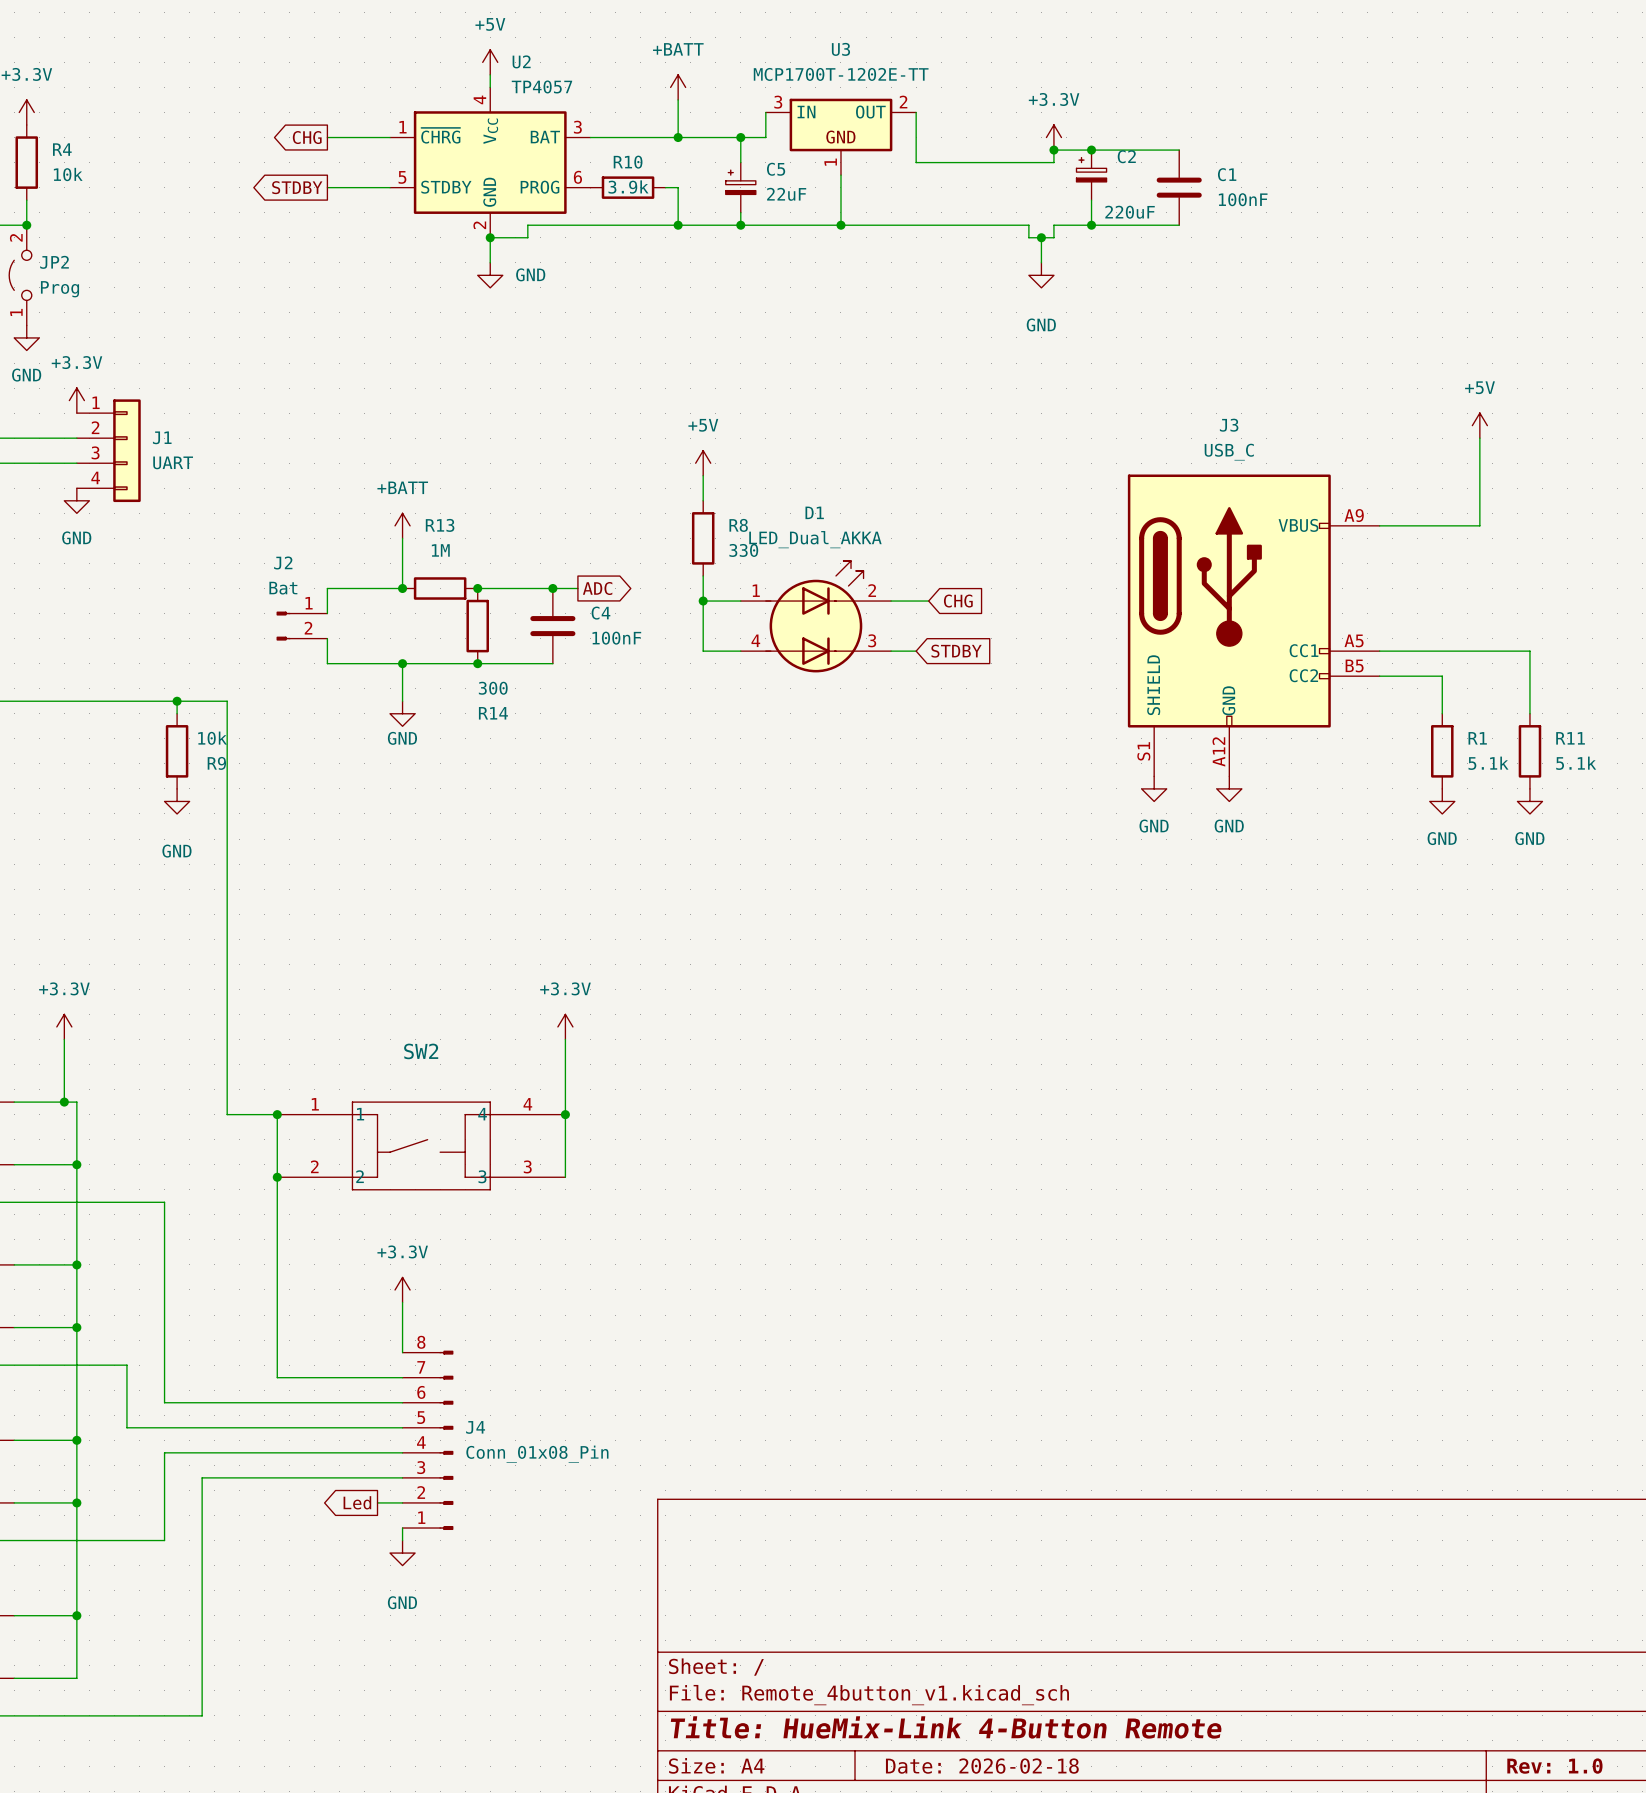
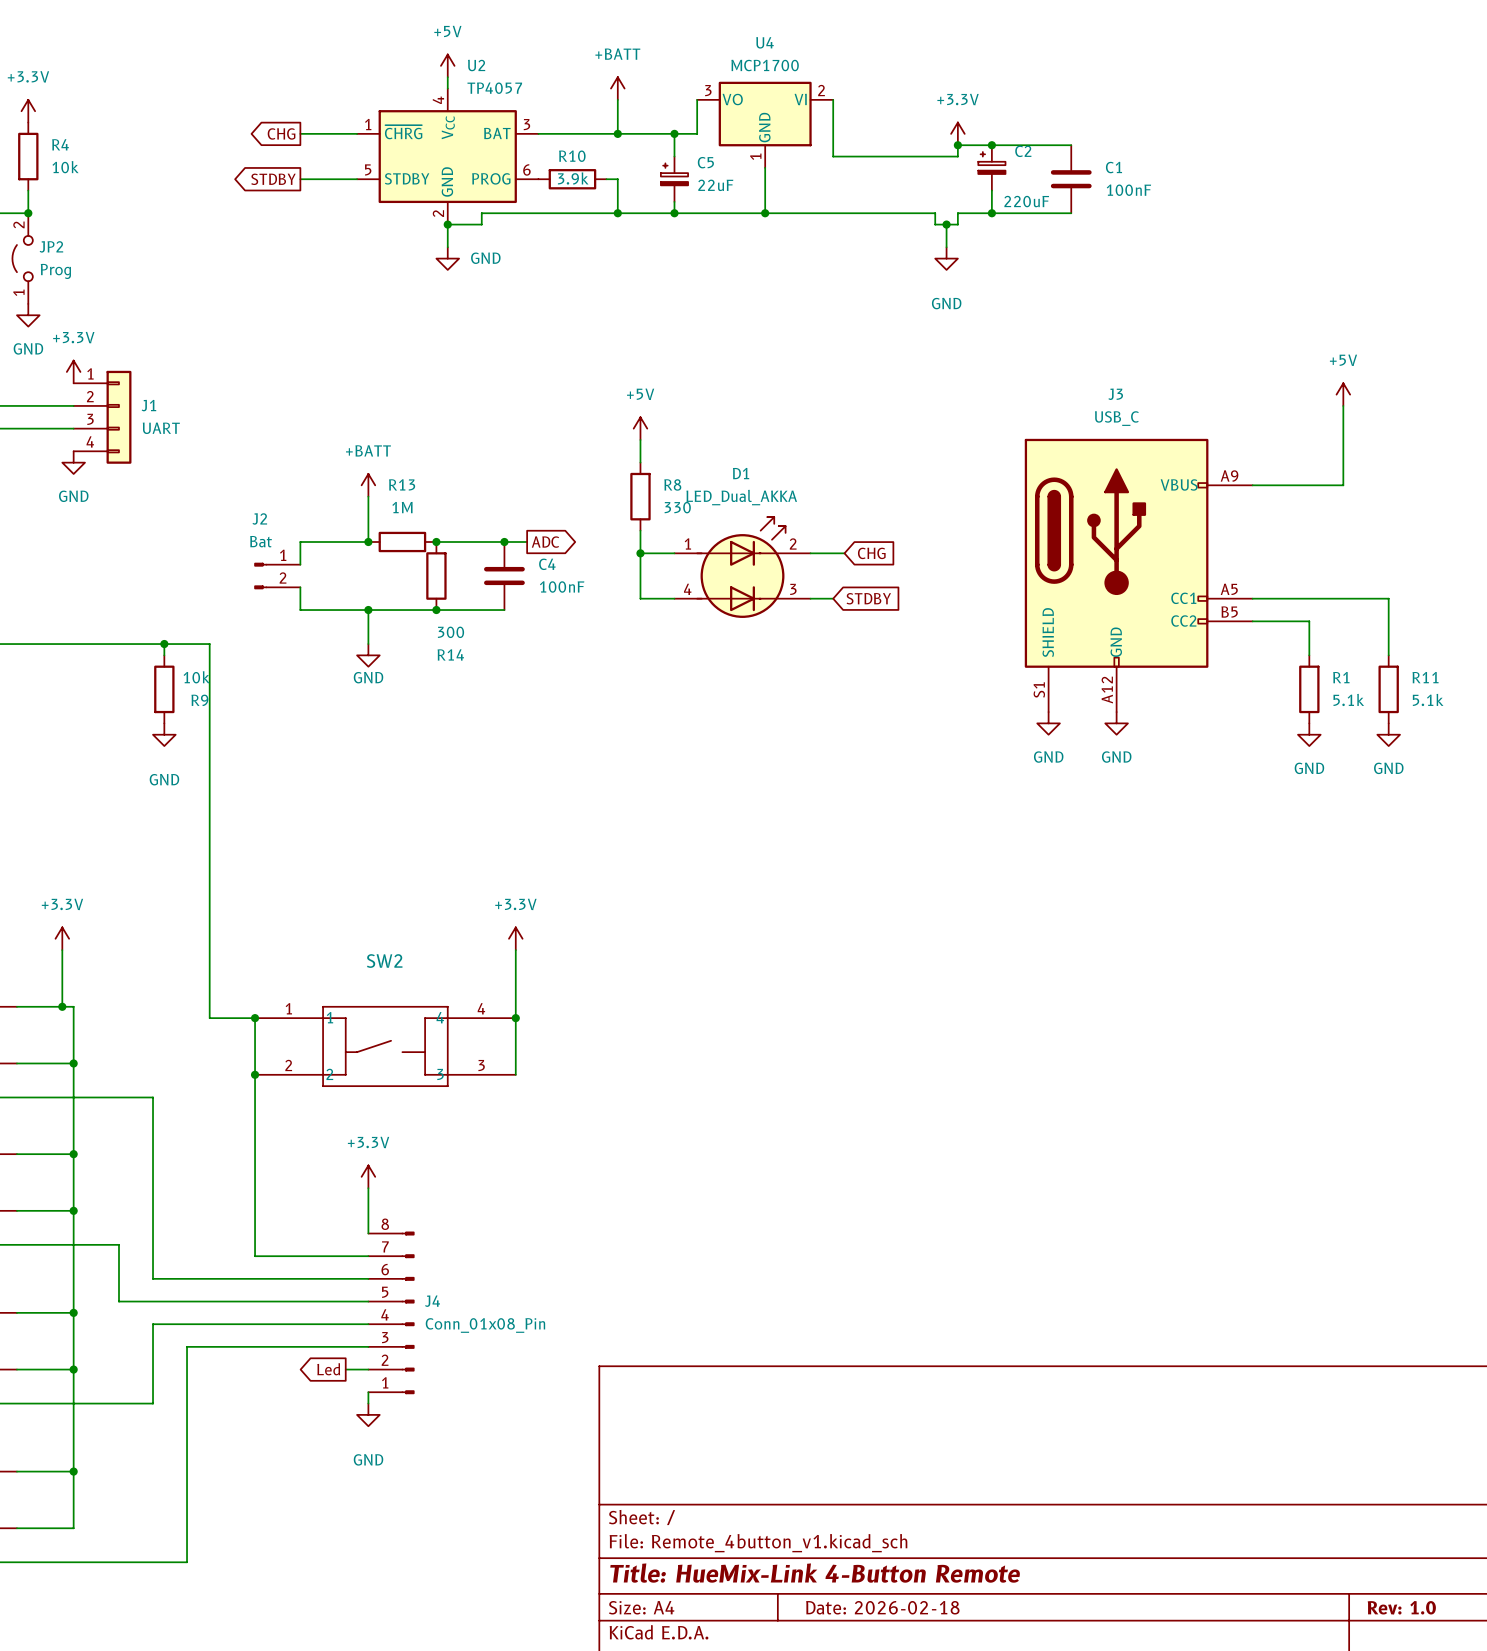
wire: none -> (697, 99) (697, 111)
wire: none -> (833, 99) (833, 111)
U4: none -> MCP1700 (765, 124)
U3: MCP1700T-1202E-TT (840, 136) -> none

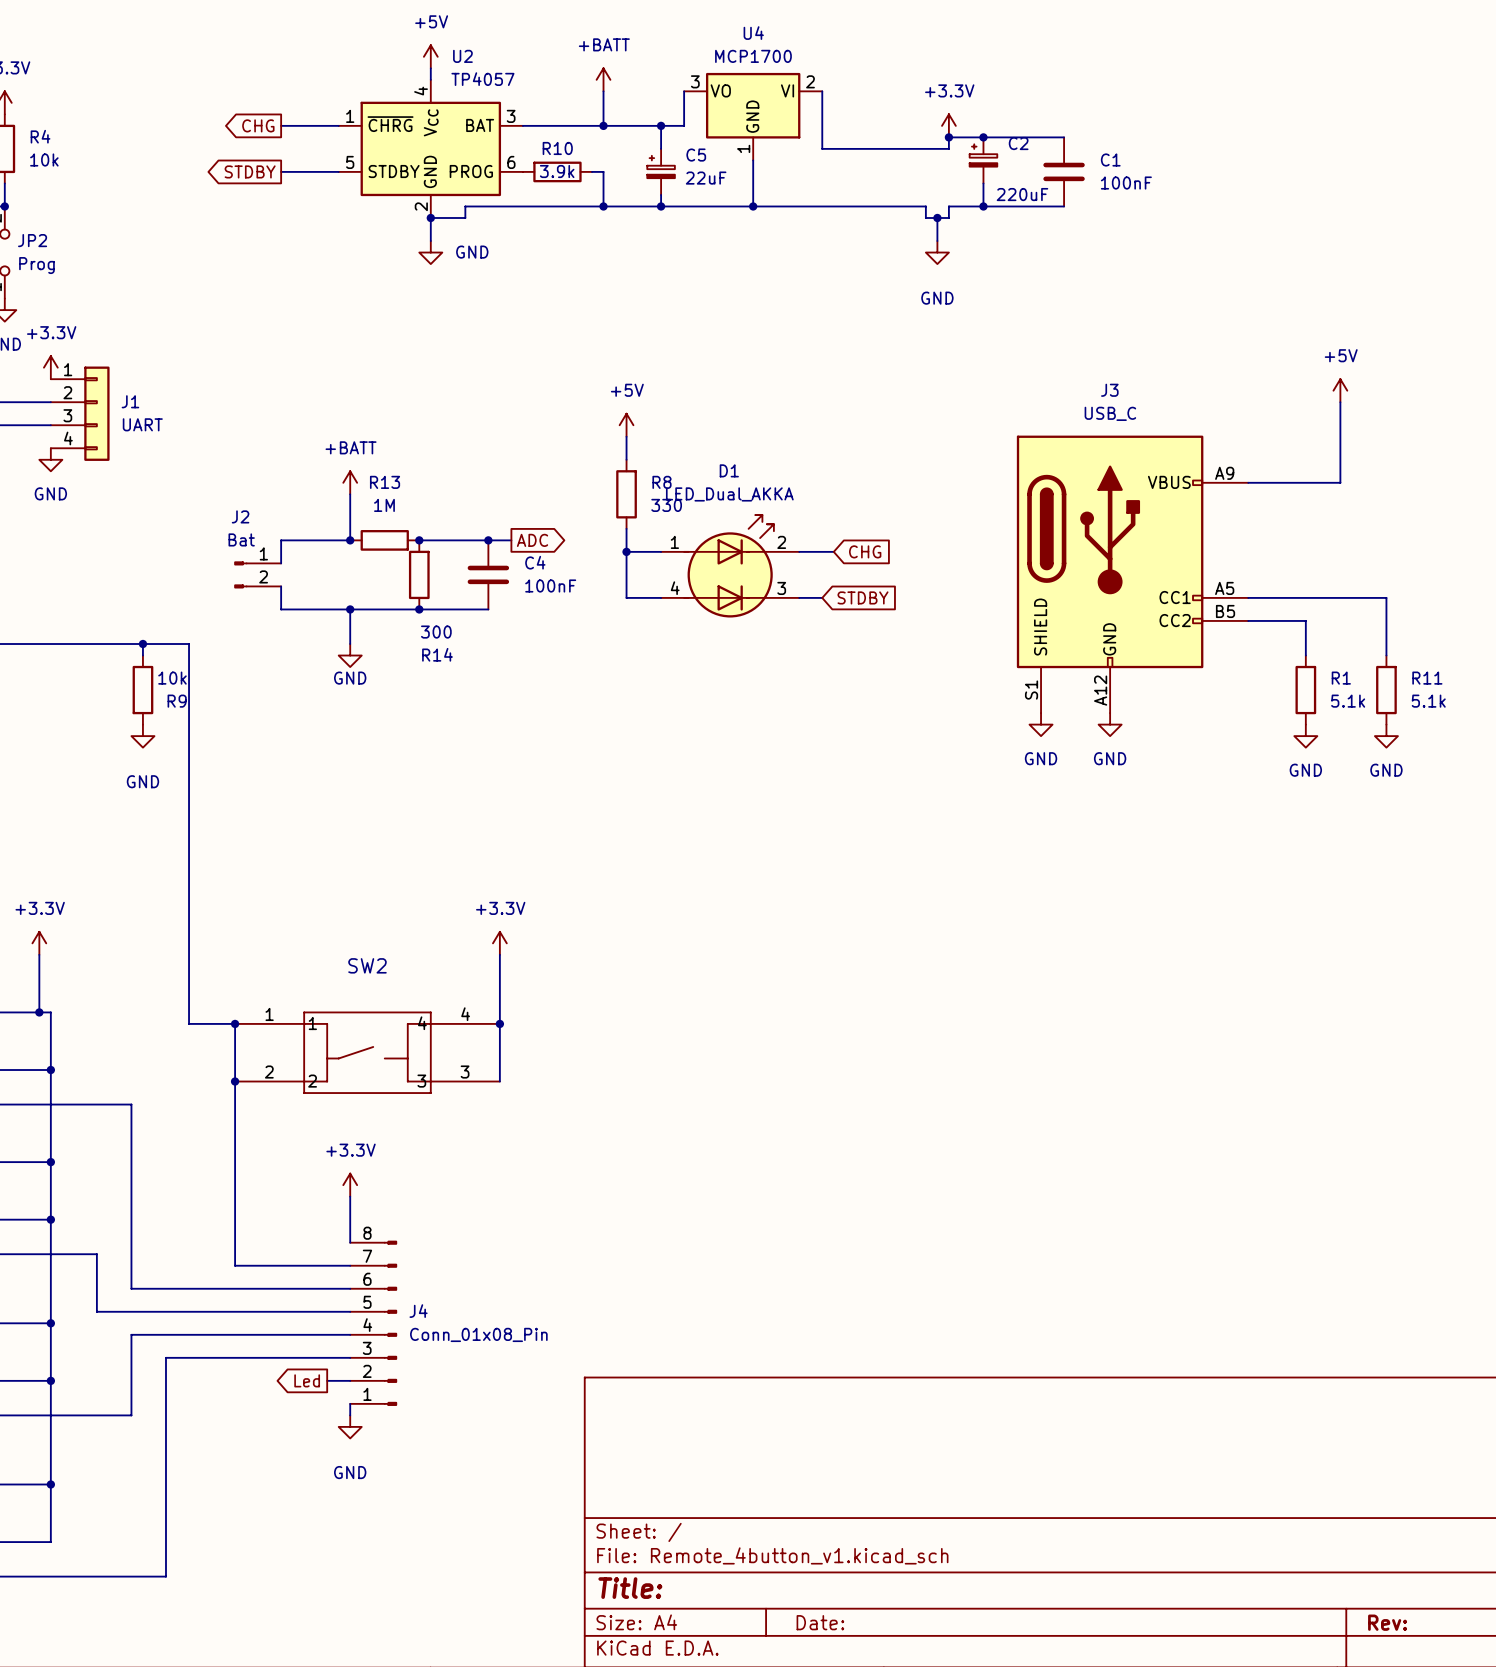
title block: Title: HueMix-Link 4-Button Remote (815, 1573) -> Title: (630, 1588)
title block: Date: 2026-02-18 (882, 1607) -> Date: (820, 1622)
title block: Rev: 1.0 (1401, 1607) -> Rev: (1387, 1622)

